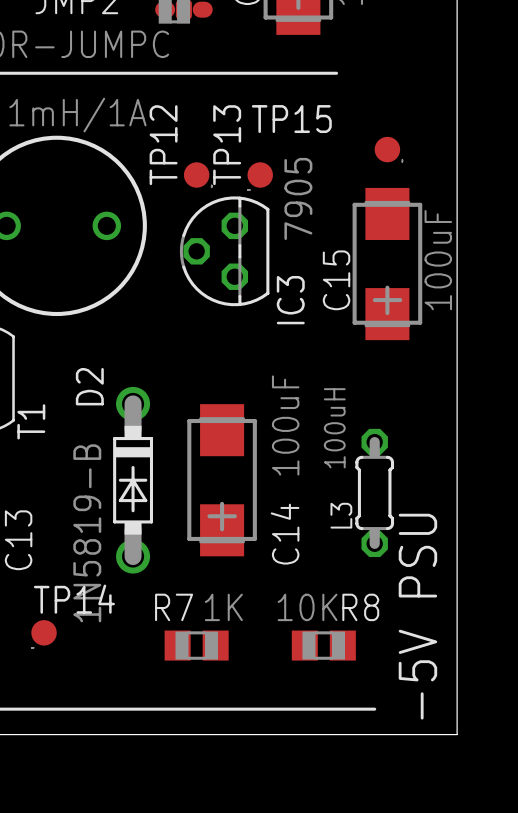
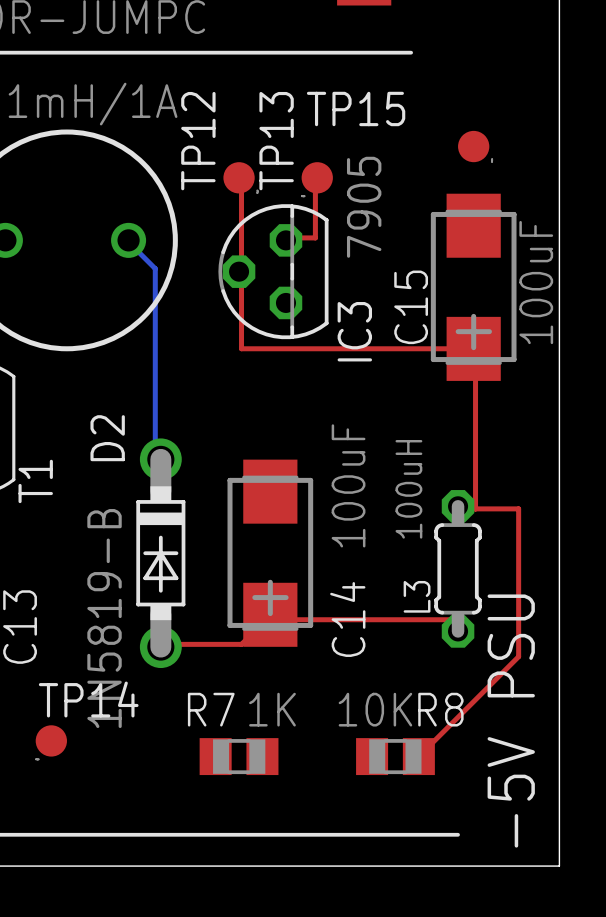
top track: none -> (239, 177) (241, 182) (241, 268) (239, 271) (241, 274) (241, 348) (473, 348) (475, 354) (475, 508)
top track: none -> (317, 177) (315, 182) (315, 237) (290, 237) (285, 240)
bottom track: none -> (128, 240) (155, 268) (155, 453) (160, 459)
top track: none -> (458, 506) (463, 508) (518, 508) (518, 656) (418, 756)
top track: none -> (458, 631) (457, 625) (450, 619) (272, 619) (270, 614) (241, 644) (161, 644) (160, 647)

